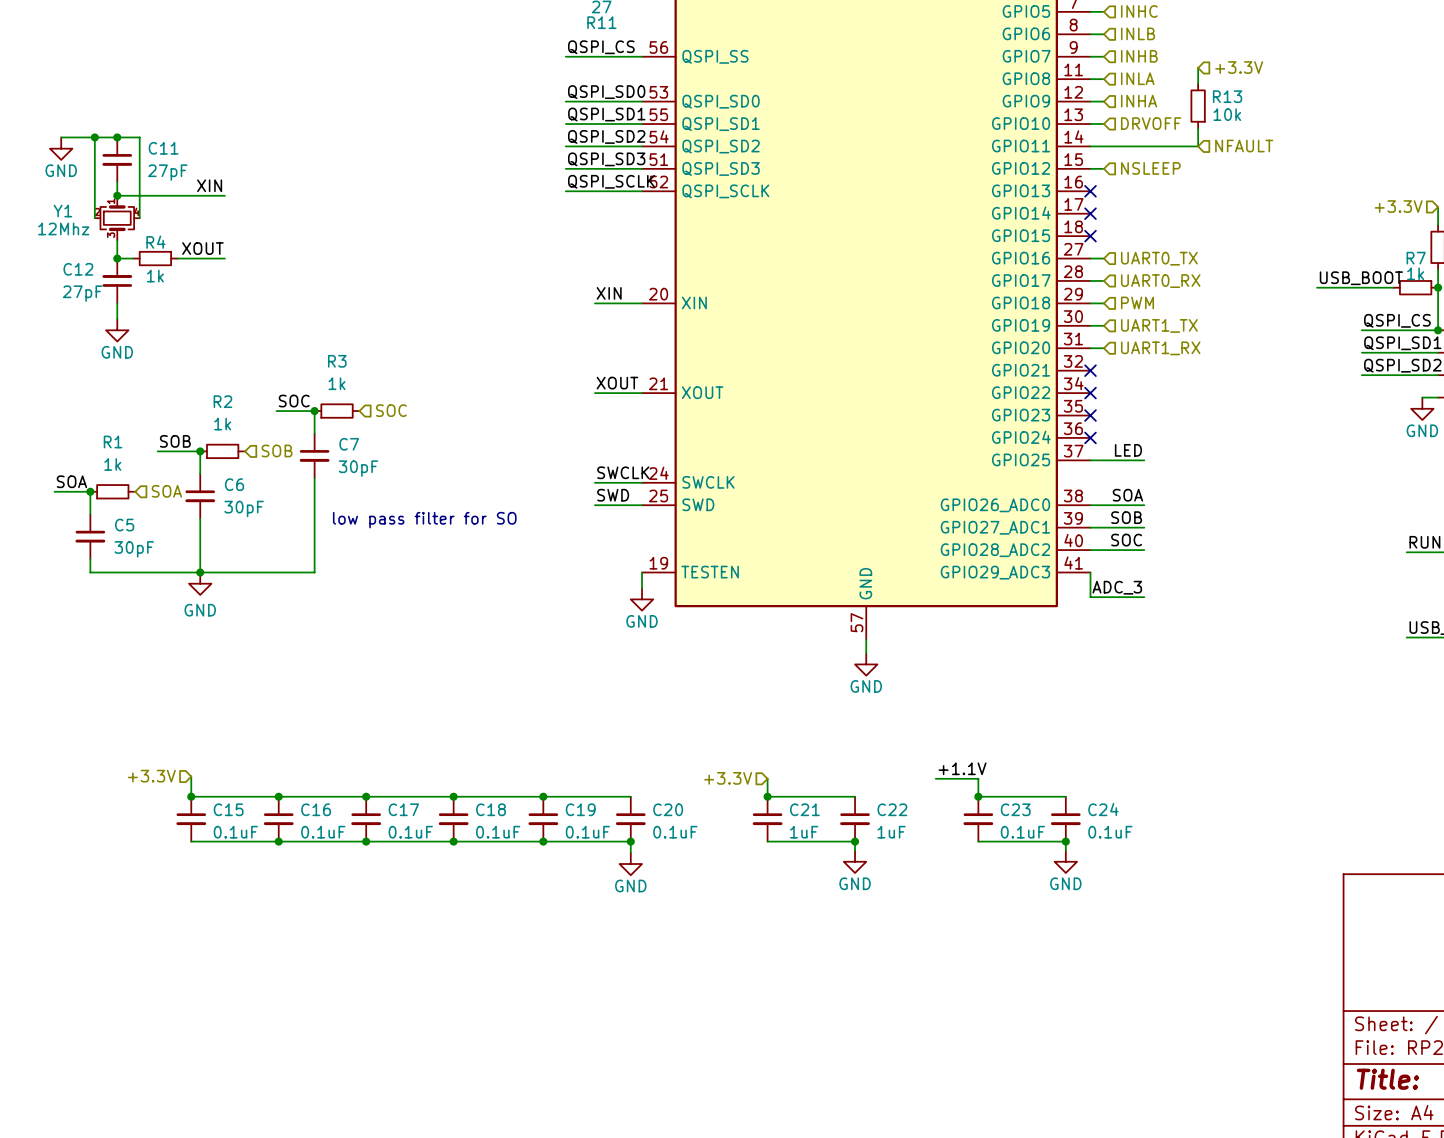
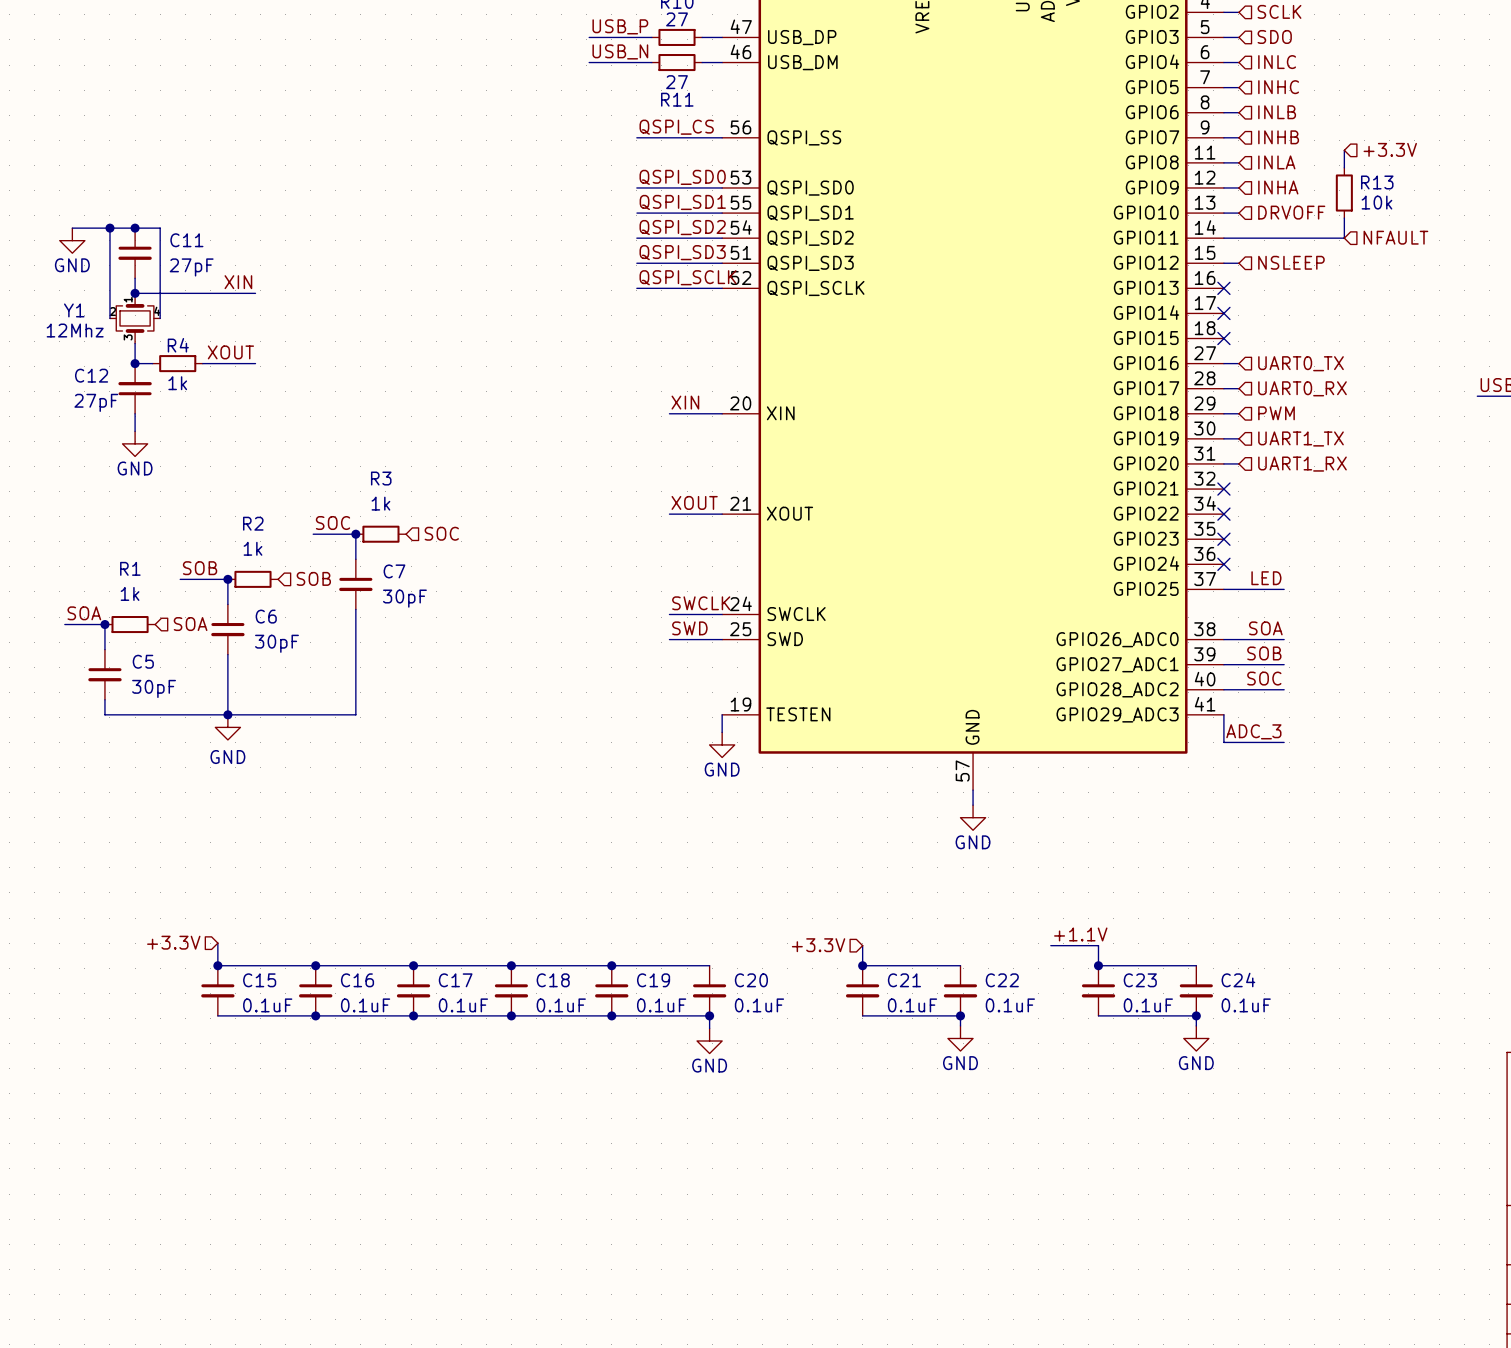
text: low pass filter for SO (424, 520) -> none
C21 value: 1uF (804, 832) -> 0.1uF (912, 1005)
C22 value: 1uF (891, 832) -> 0.1uF (1010, 1005)

